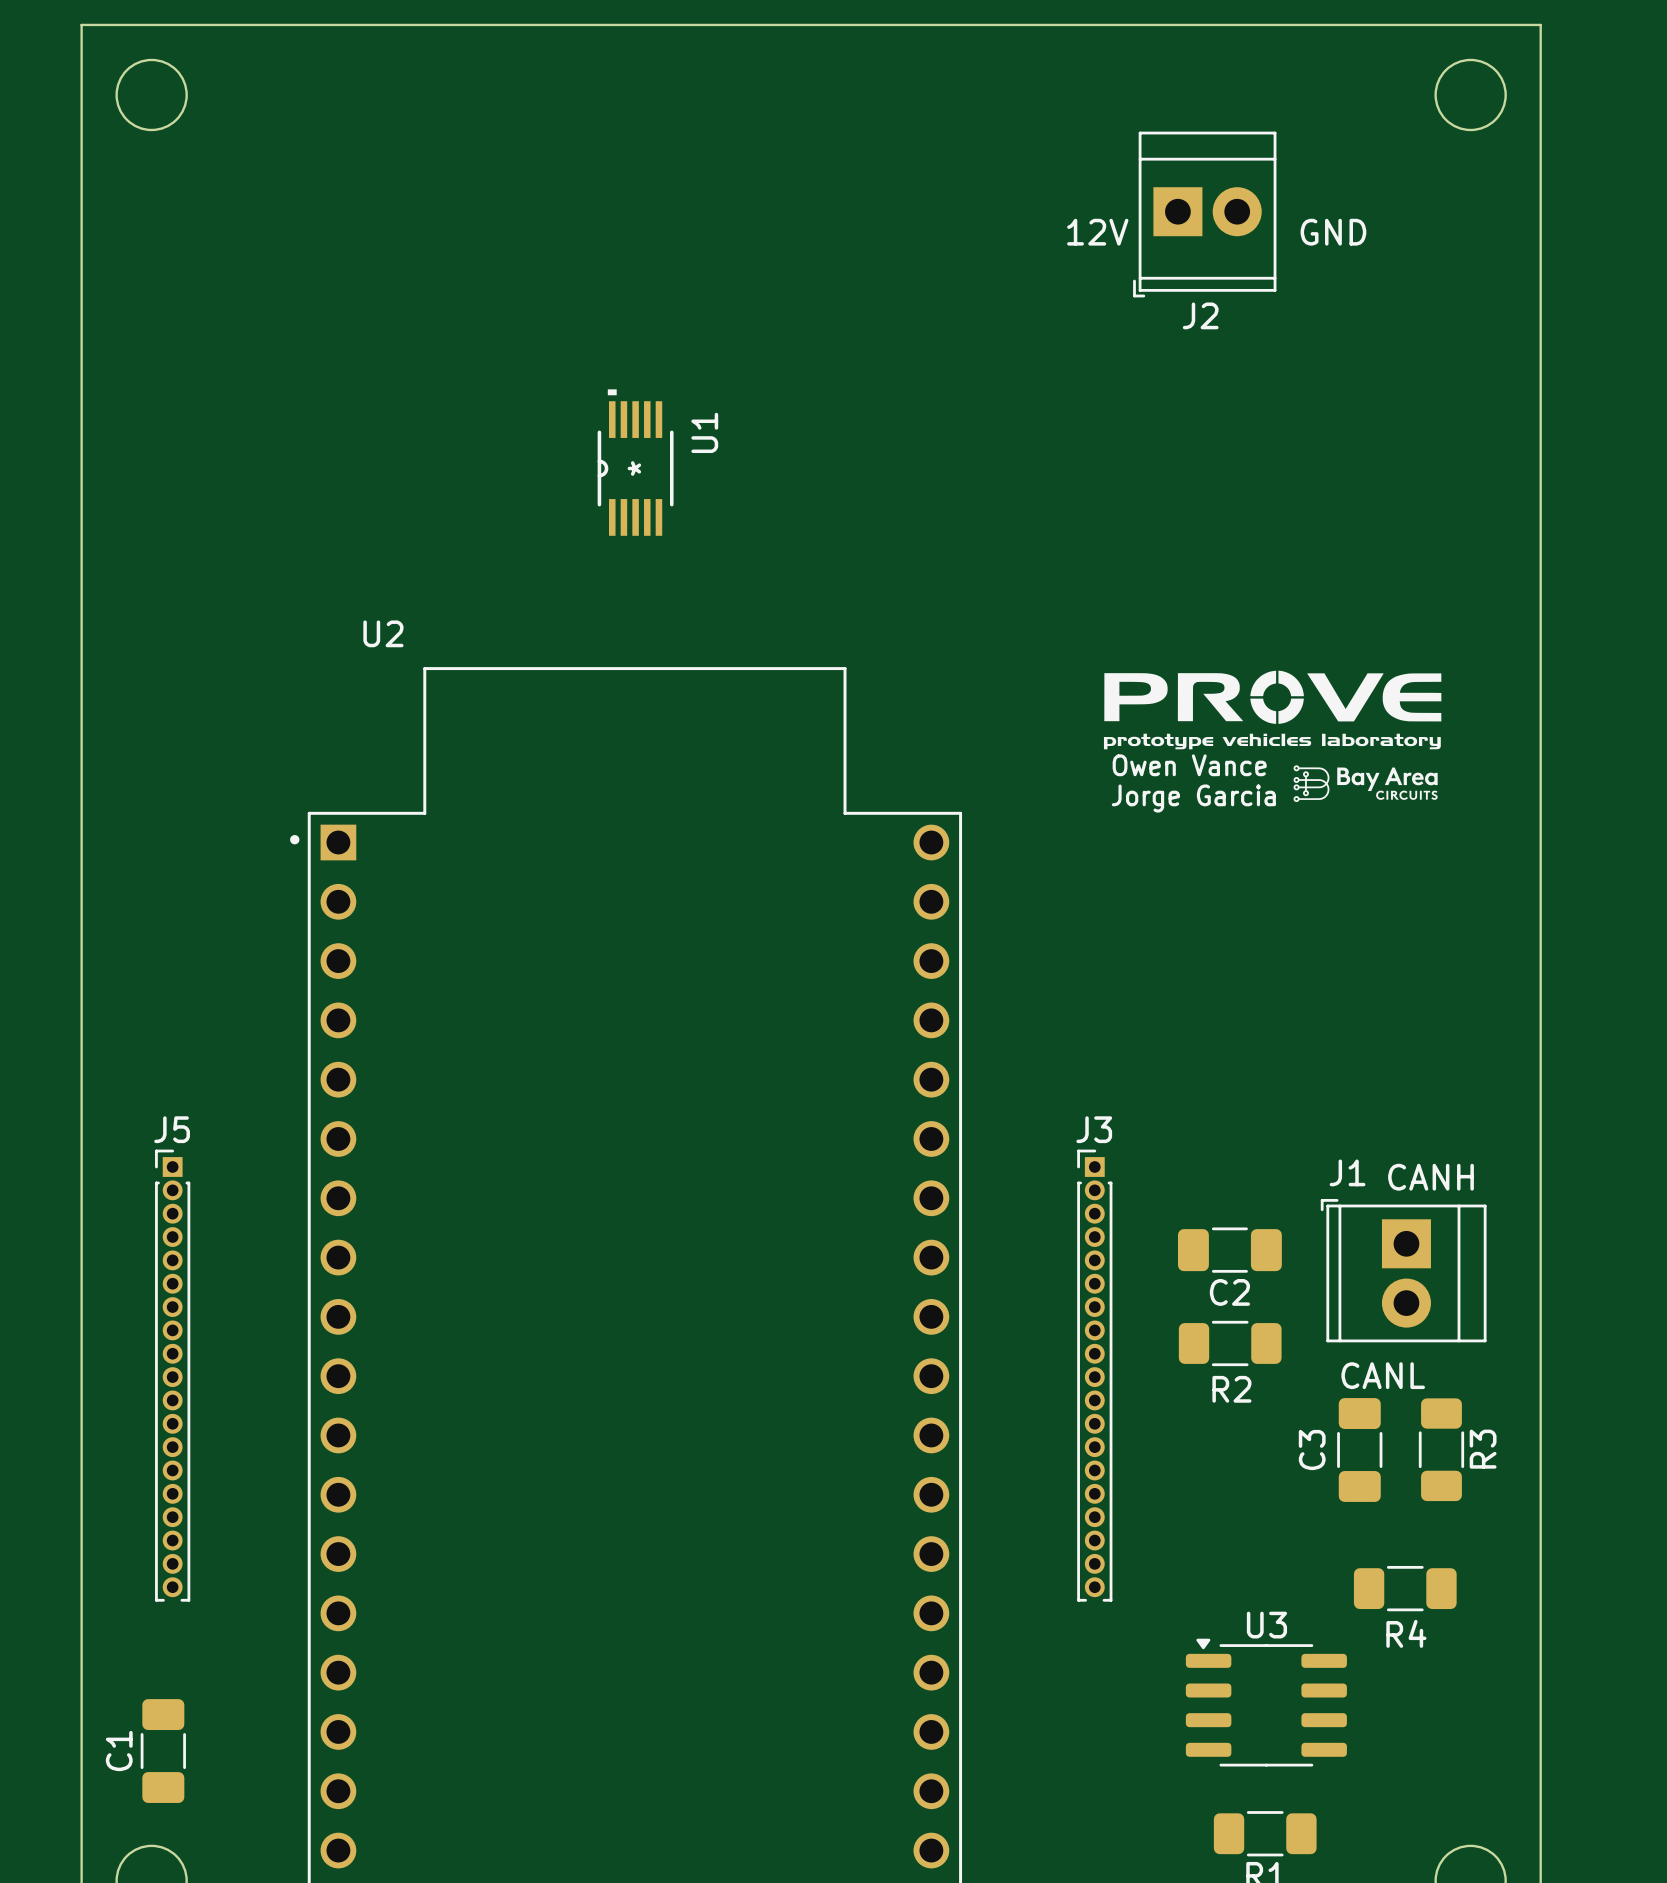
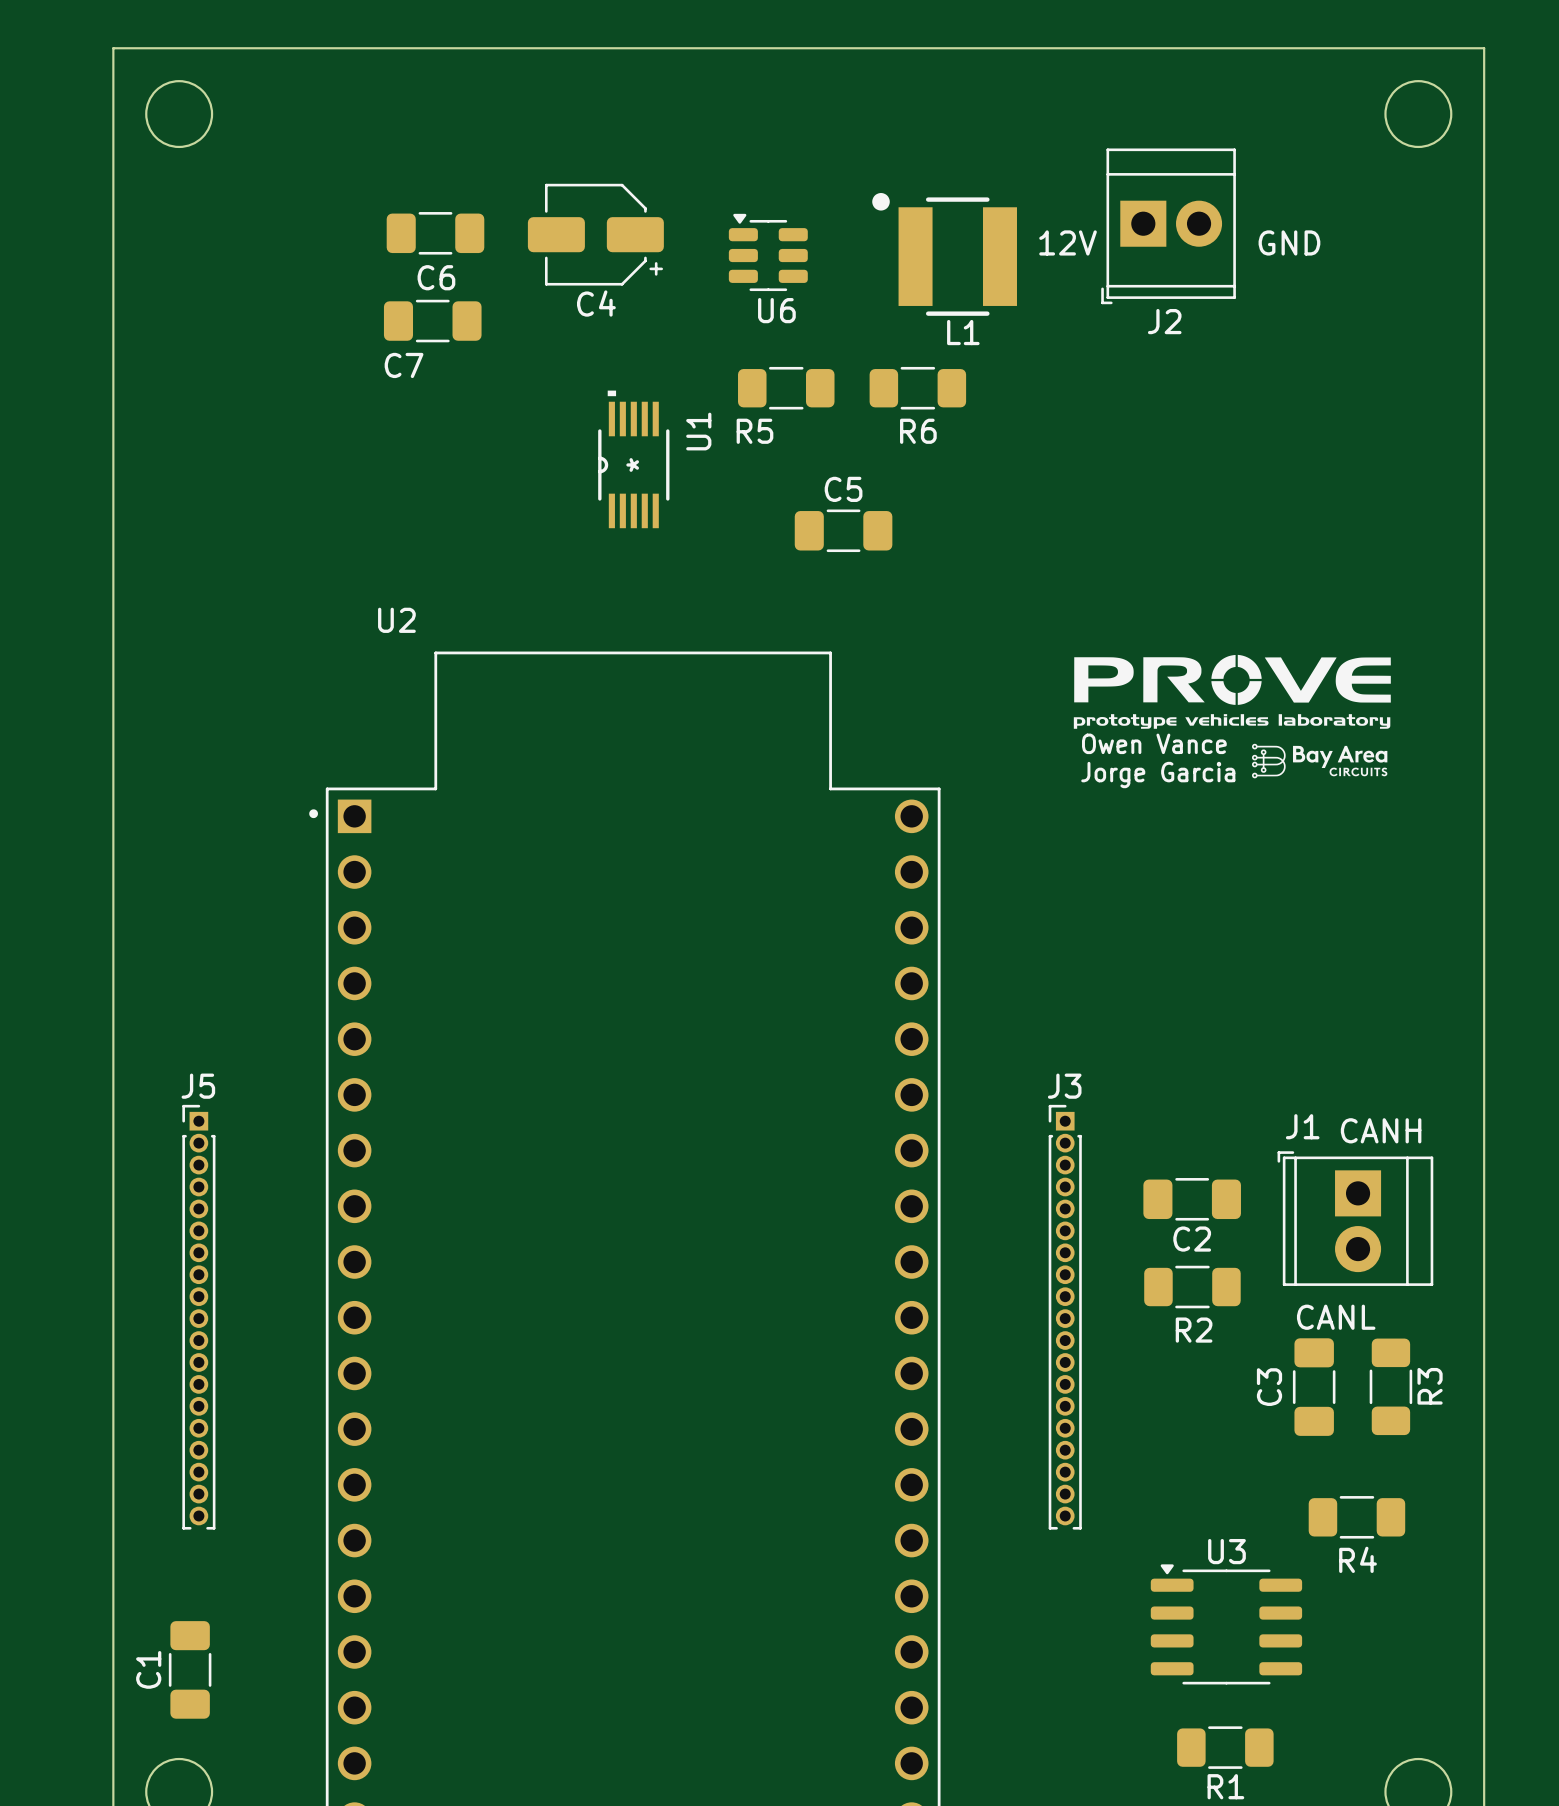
C6: none -> (435, 233)
C4: none -> (595, 234)
U6: none -> (768, 252)
L1: none -> (944, 254)
C7: none -> (432, 321)
R5: none -> (786, 388)
R6: none -> (917, 388)
C5: none -> (843, 530)

